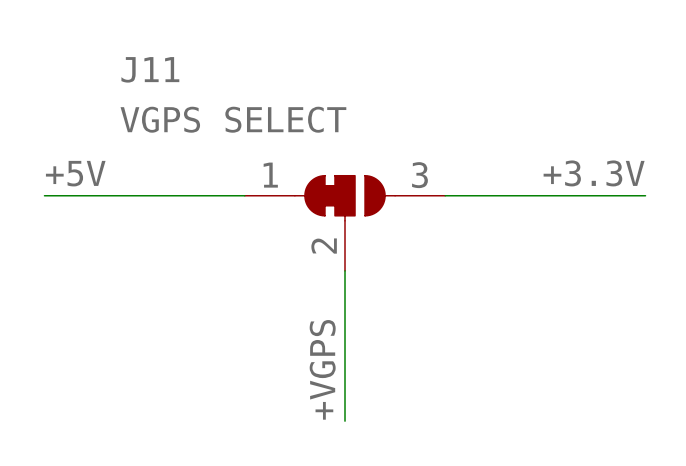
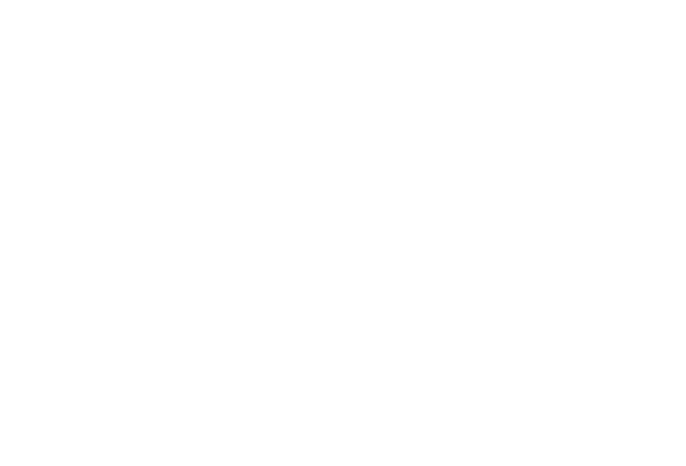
label: +5V (75, 173) -> none
label: +3.3V (594, 173) -> none
wire: (44, 195) (244, 195) -> none
wire: (445, 195) (645, 195) -> none
J11: VGPS SELECT (345, 223) -> none
wire: (345, 270) (345, 421) -> none
label: +VGPS (322, 369) -> none

